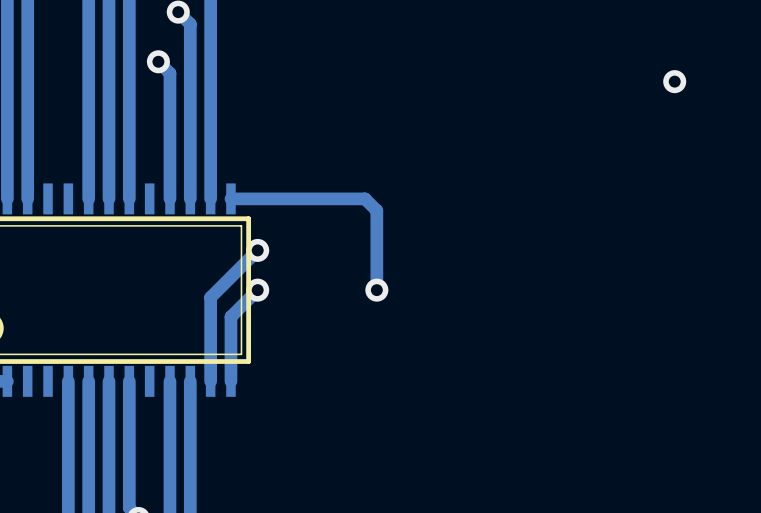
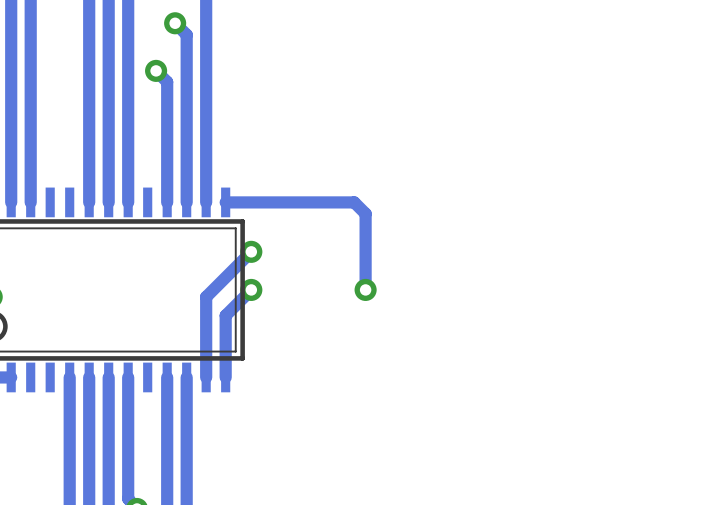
via: (674, 81) -> none

